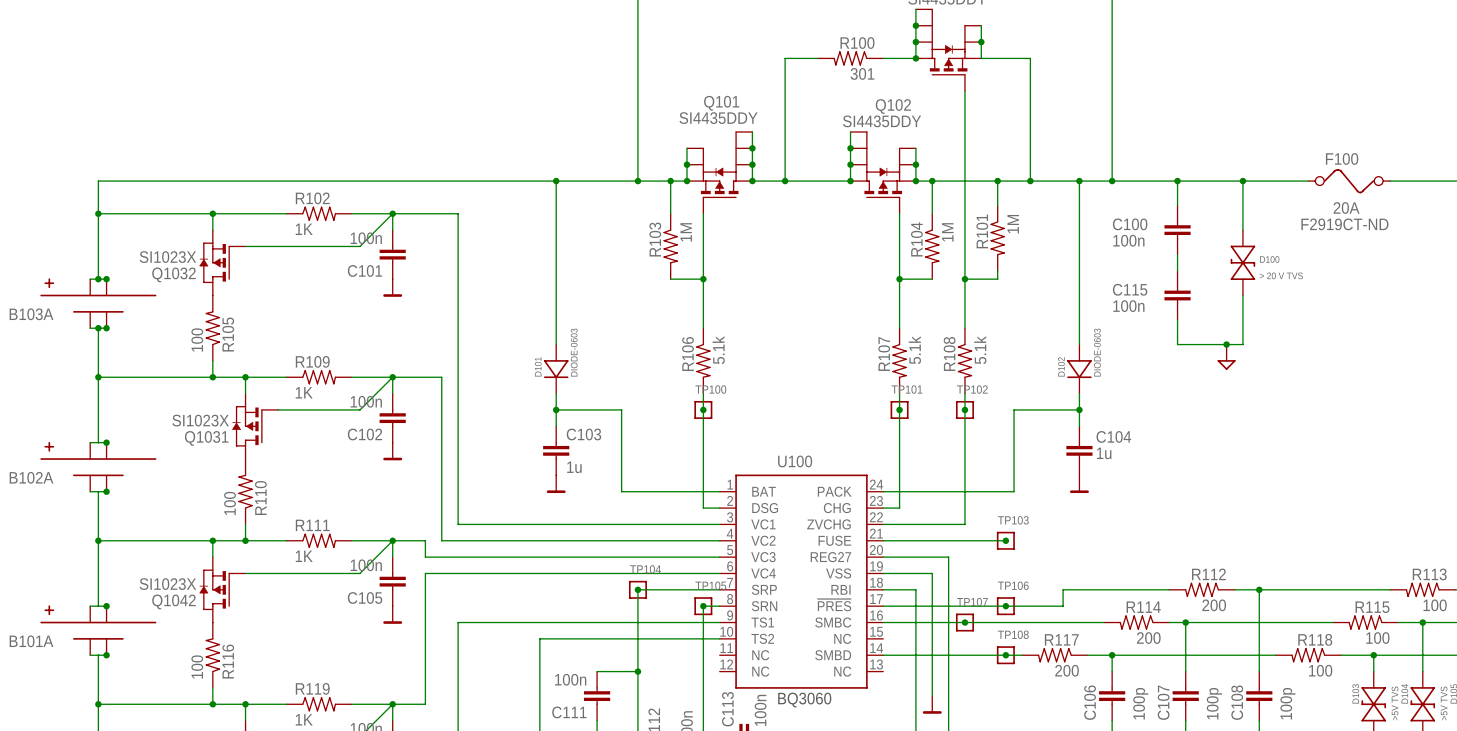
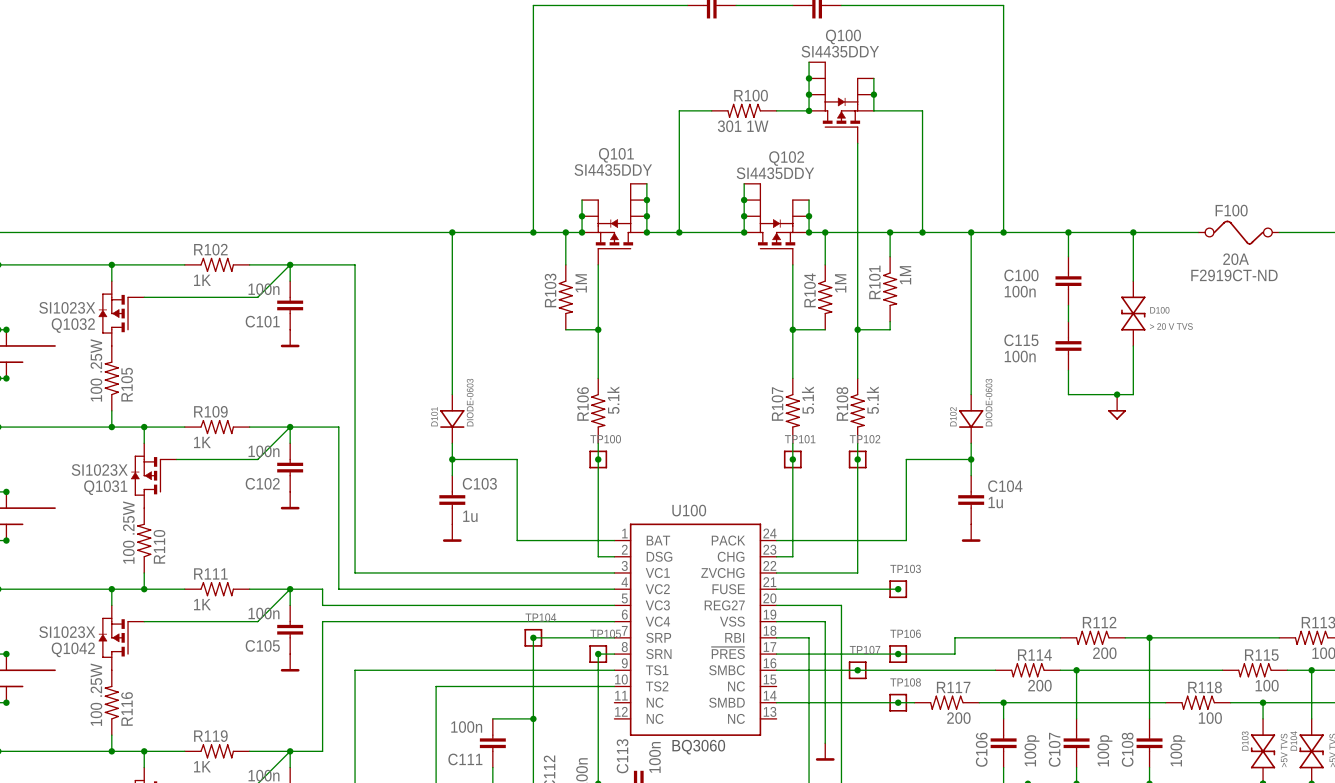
R100 value: 301 (862, 73) -> 301 1W (743, 126)
R105 value: 100 (197, 339) -> 100 .25W (96, 370)
R110 value: 100 (230, 503) -> 100 .25W (128, 532)
R116 value: 100 (197, 666) -> 100 .25W (96, 694)

